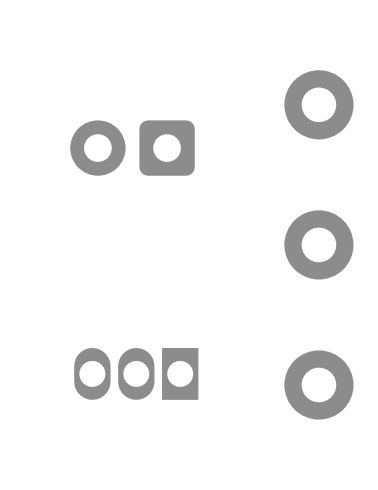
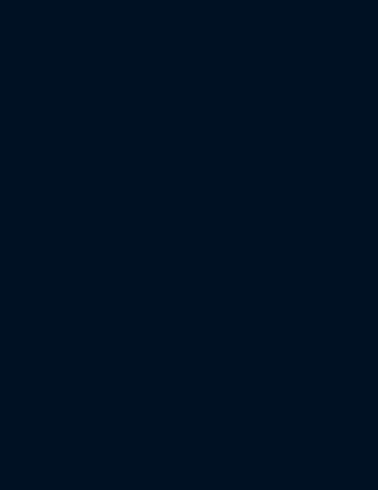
part: (318, 104) -> none
part: (132, 148) -> none
part: (318, 244) -> none
part: (136, 373) -> none
part: (318, 384) -> none

